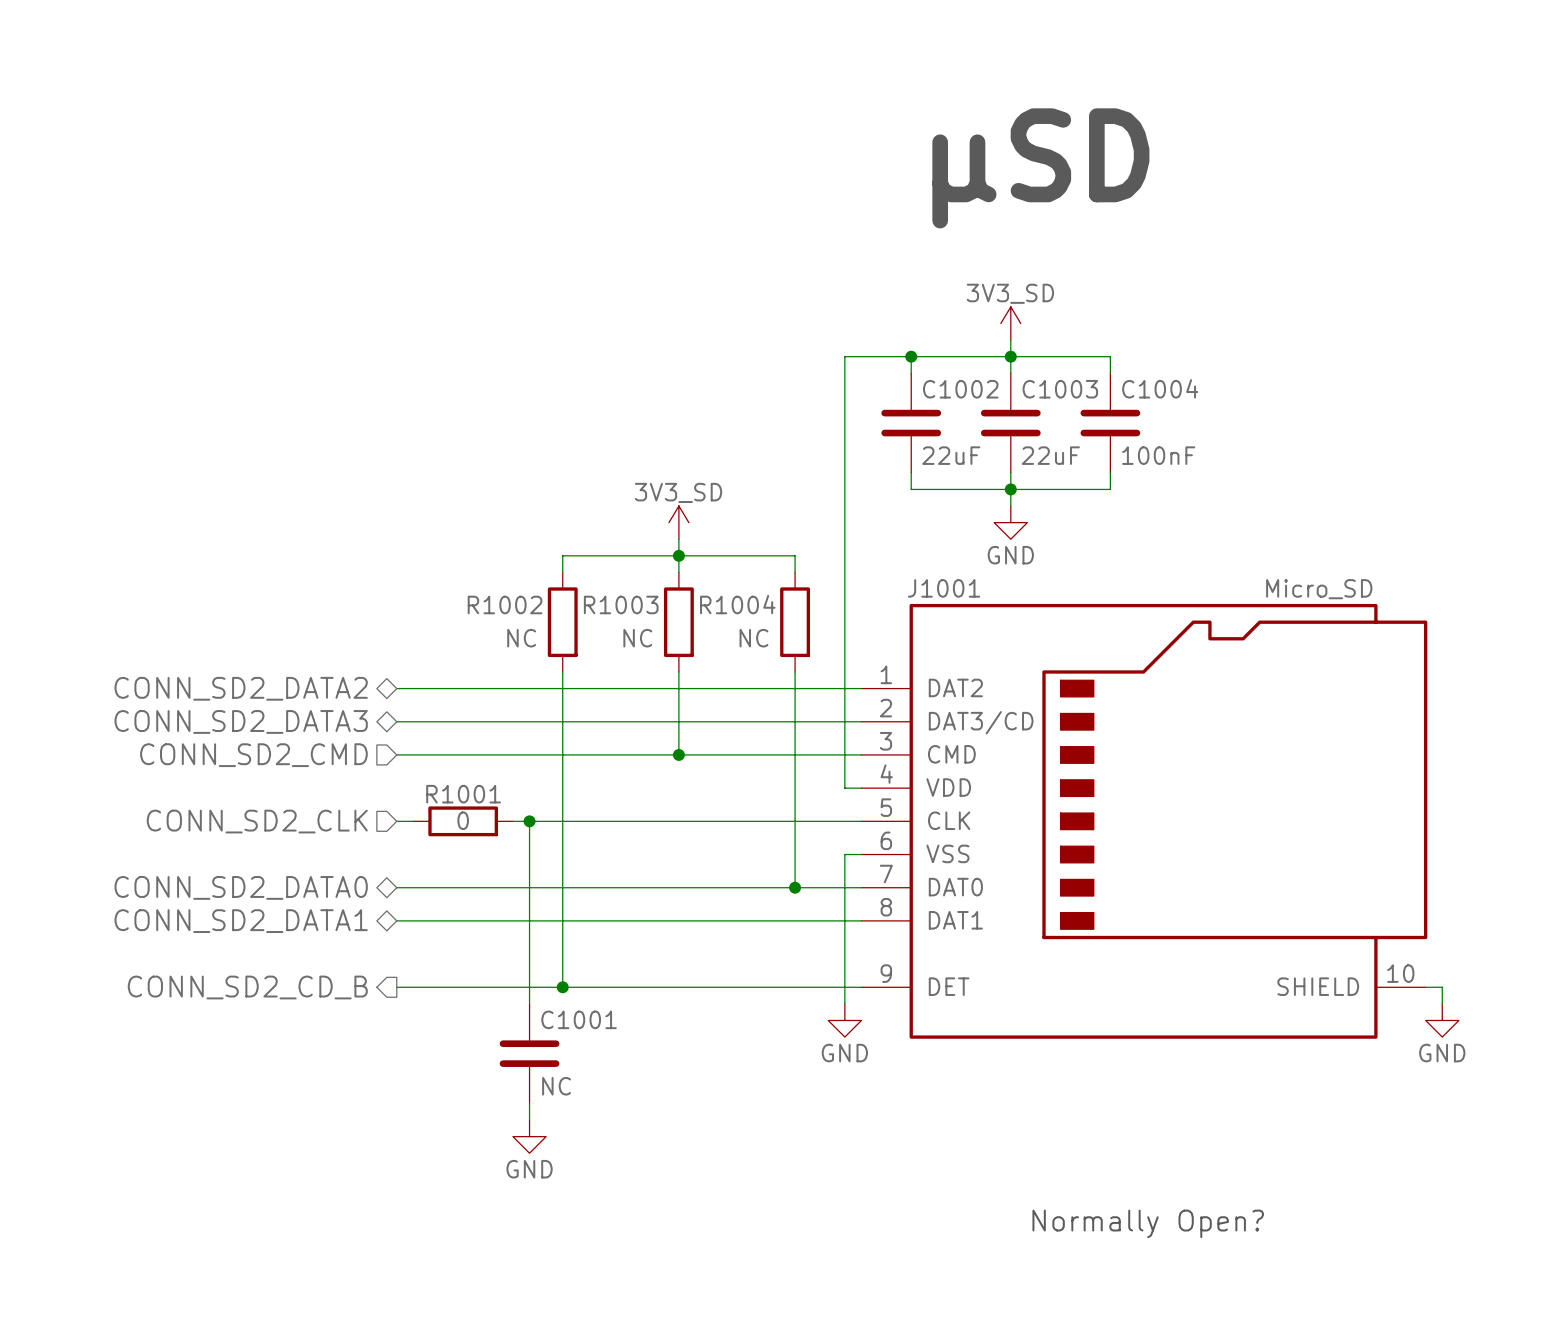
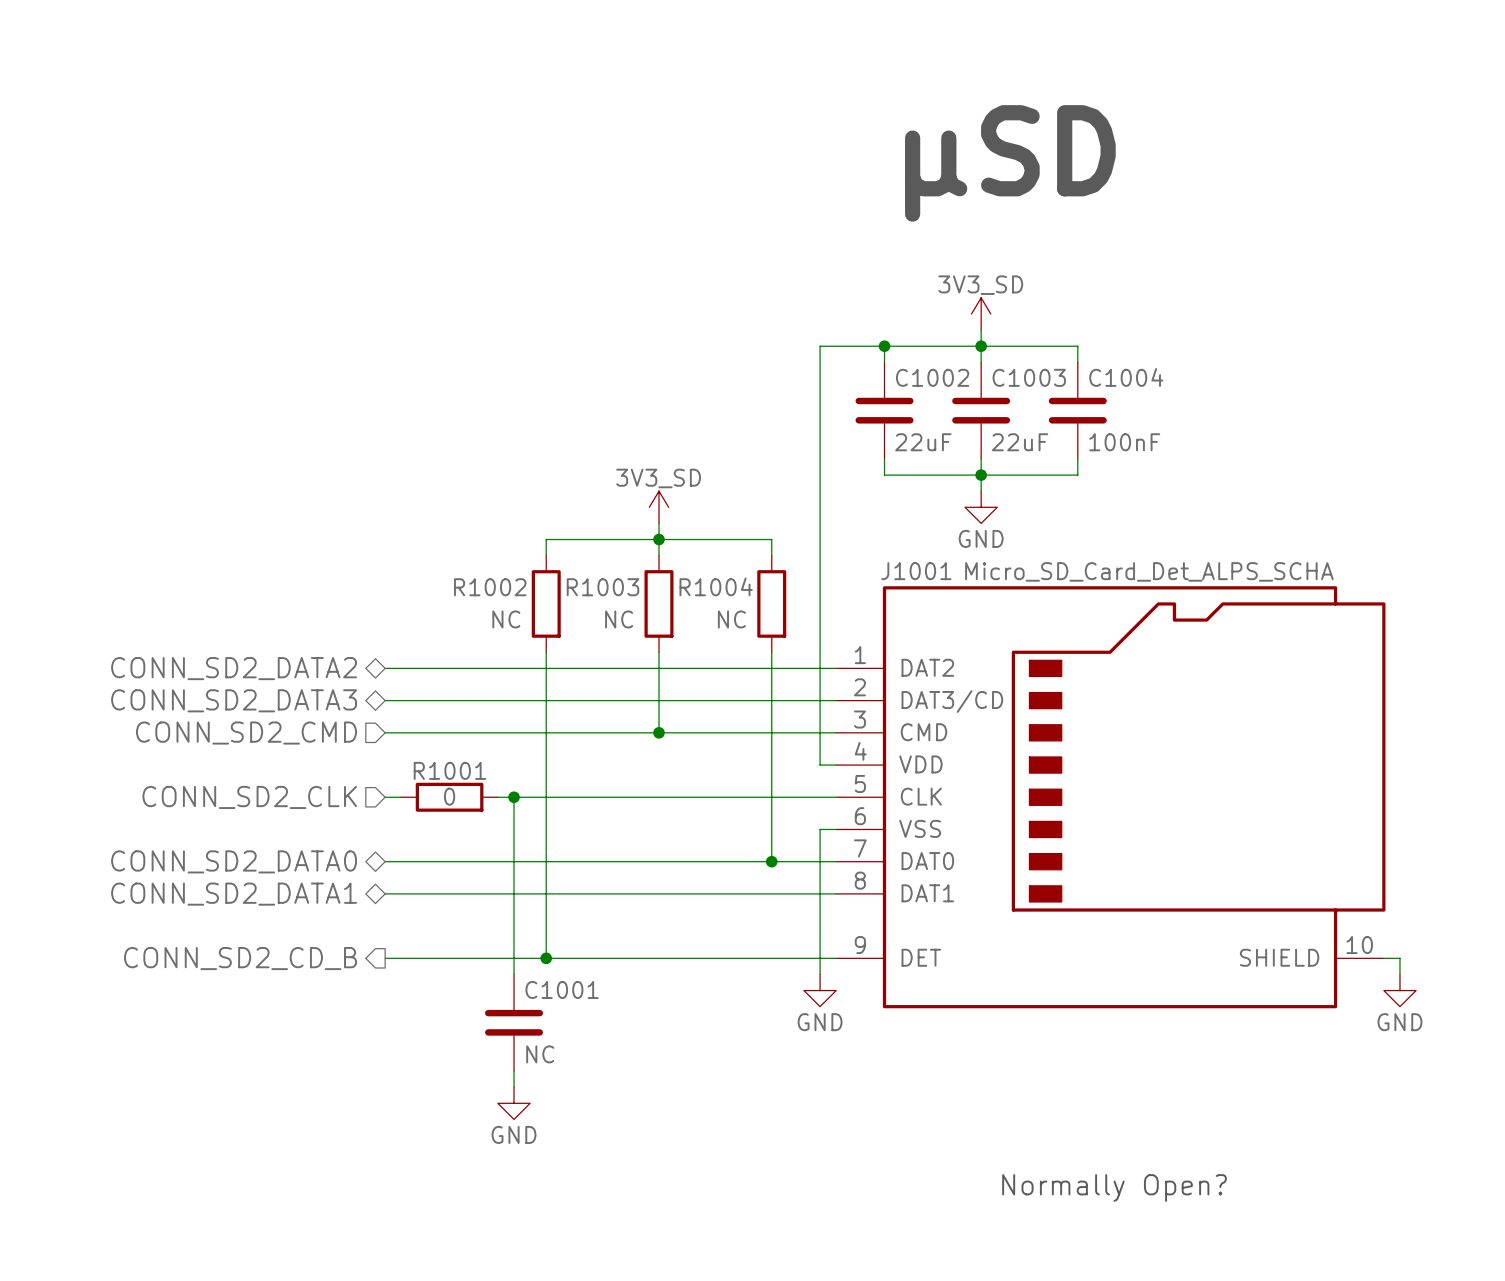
J1001 value: Micro_SD (1319, 589) -> Micro_SD_Card_Det_ALPS_SCHA (1149, 571)

